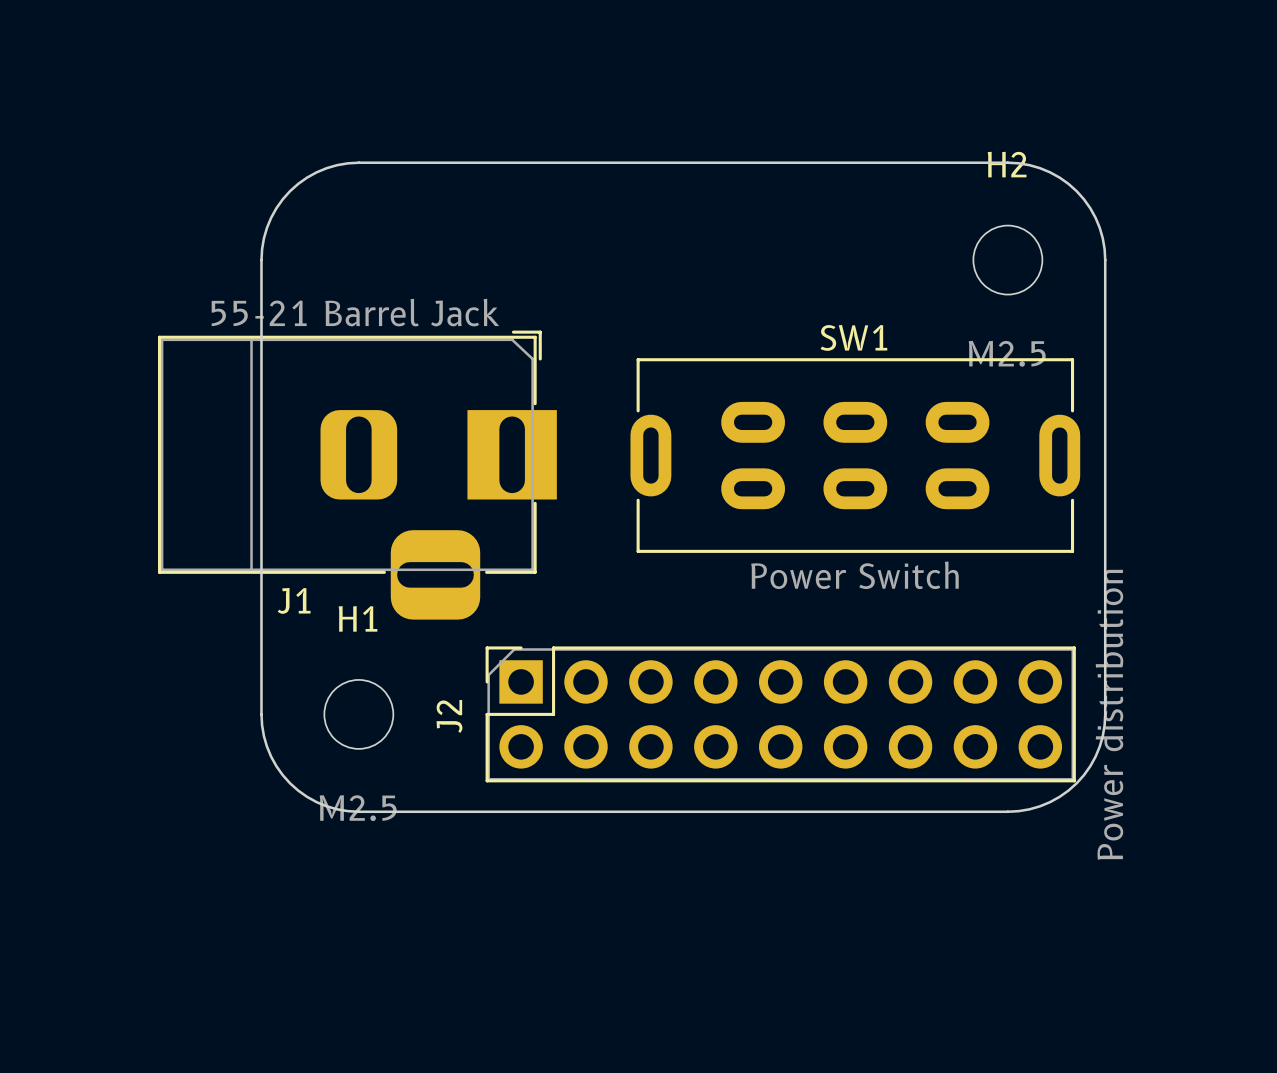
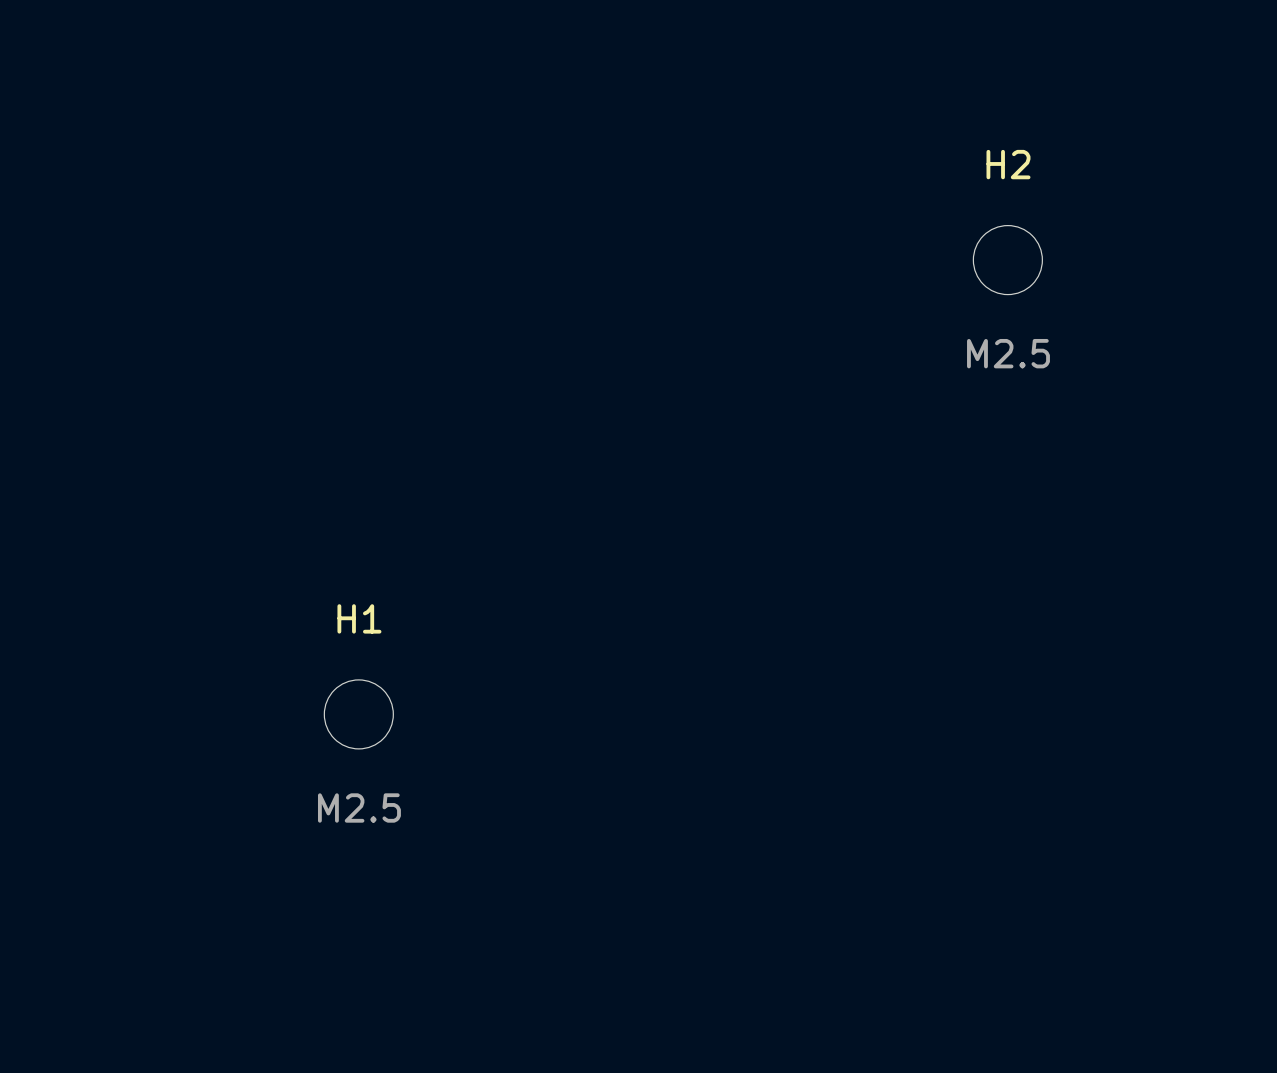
board edge: (358, 162) (1007, 162) (1040, 168) (1068, 183) (1083, 199) (1095, 217) (1102, 238) (1105, 260) (1105, 714) (1099, 746) (1083, 775) (1068, 790) (1050, 802) (1029, 809) (1007, 811) (358, 811) (326, 806) (298, 790) (276, 766) (266, 746) (262, 725) (262, 249) (271, 217) (290, 191) (316, 172) (337, 165) (358, 162) -> none
SW1: Power Switch (855, 455) -> none
J1: 55-21 Barrel Jack (357, 475) -> none
J2: Power distribution (780, 714) -> none

